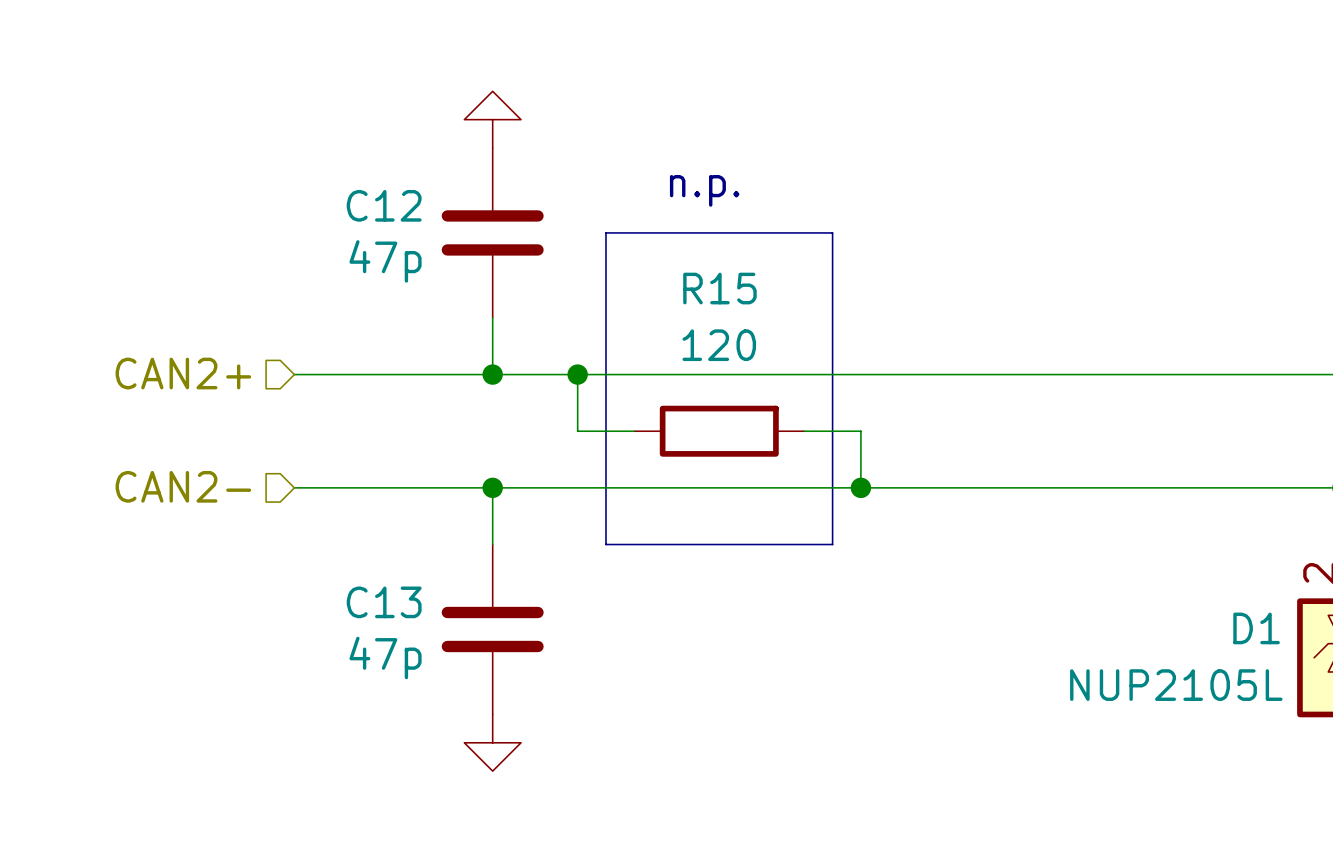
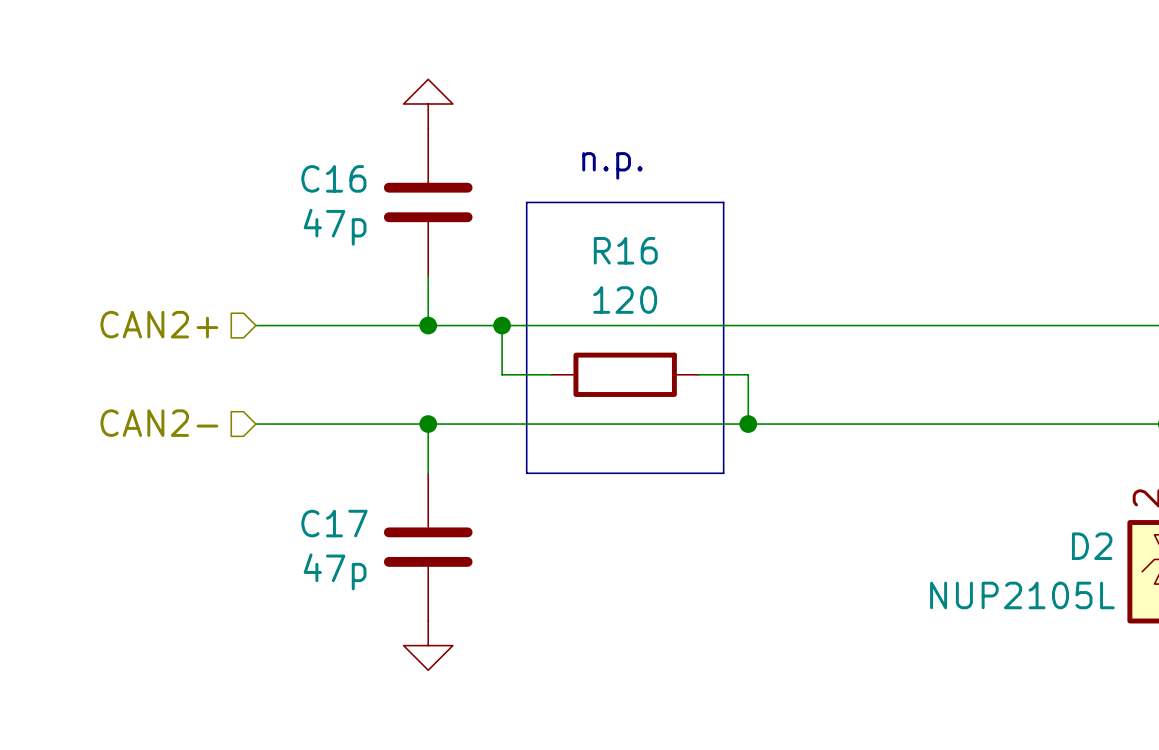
C12 name: C12 (384, 205) -> C16 (333, 178)
R15 name: R15 (719, 288) -> R16 (625, 250)
C13 name: C13 (384, 602) -> C17 (334, 523)
D1 name: D1 (1256, 628) -> D2 (1092, 546)

